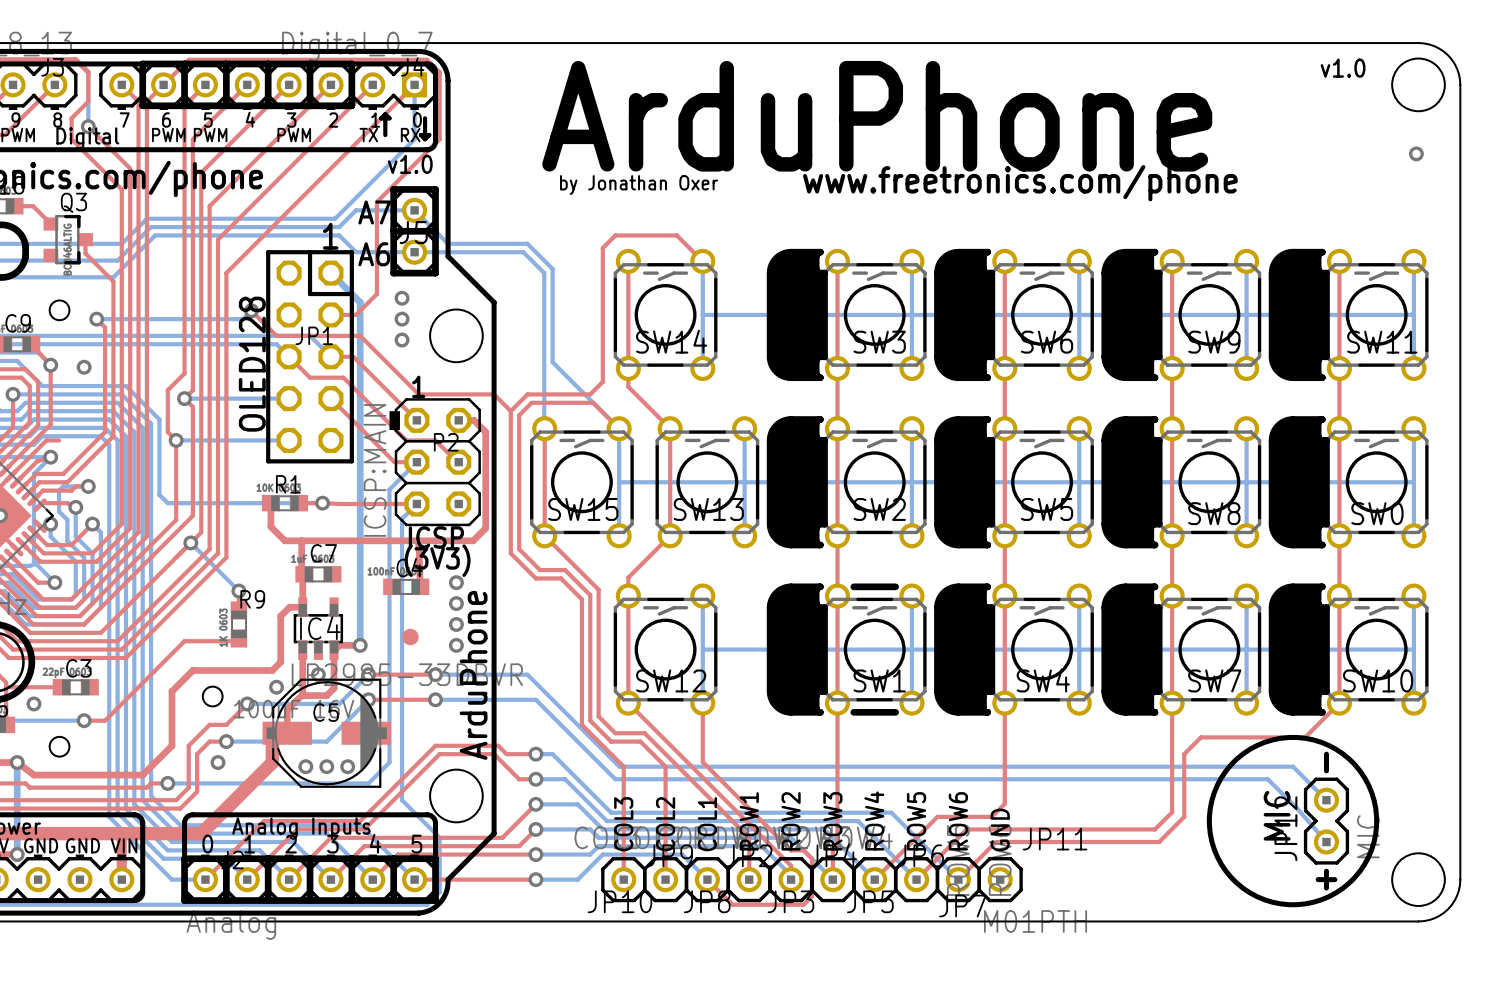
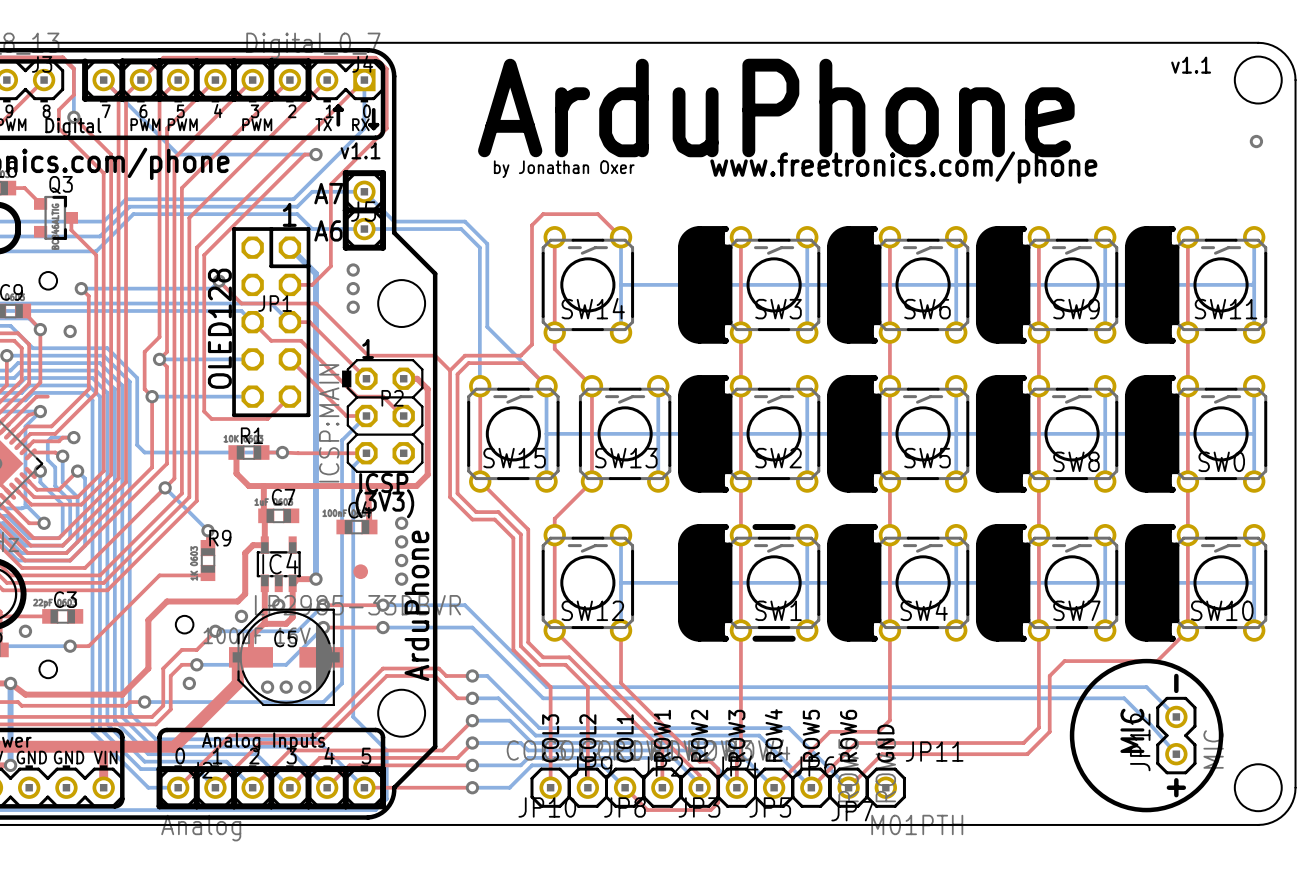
line: none -> (85, 61) (85, 98) (122, 98)
text: v1.0 (1343, 68) -> v1.1 (1191, 65)
bottom track: none -> (103, 80) (178, 154) (315, 154)
text: v1.0 (410, 164) -> v1.1 (360, 150)
top track: none -> (315, 154) (304, 154) (204, 255) (204, 411) (211, 418) (267, 418) (289, 396)
via: none -> (315, 154)

